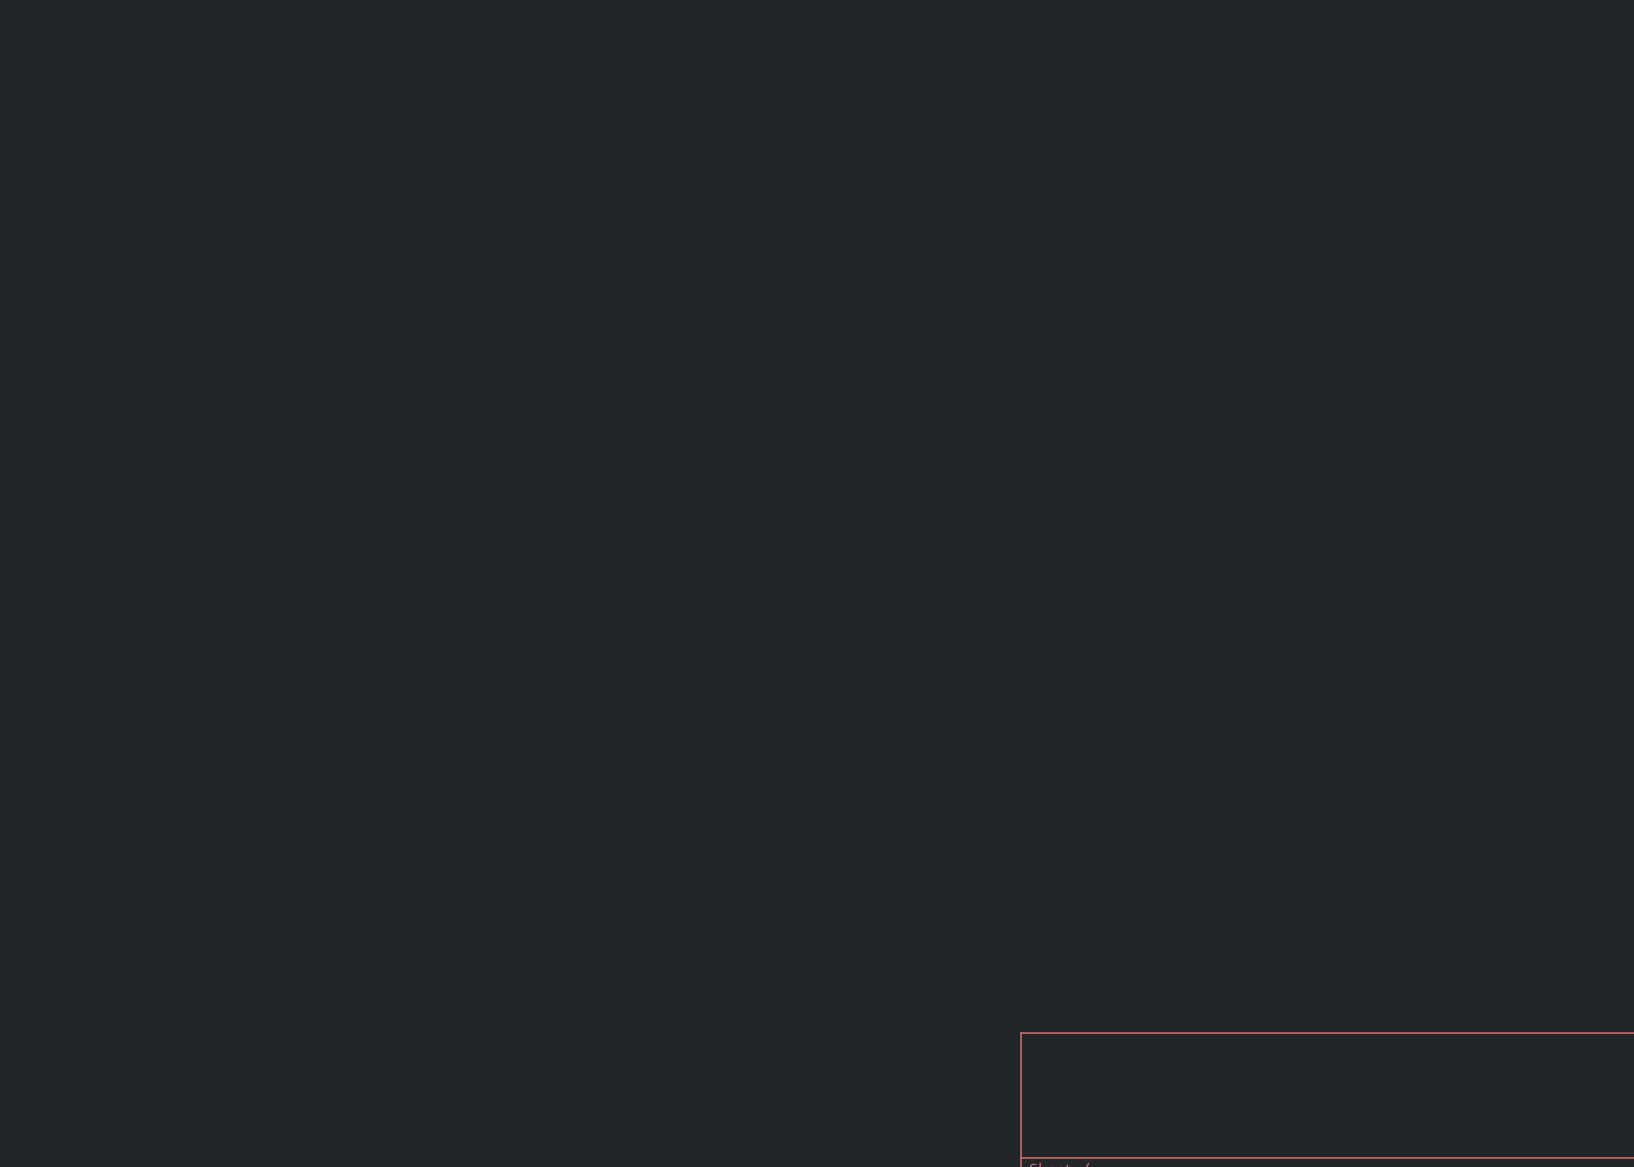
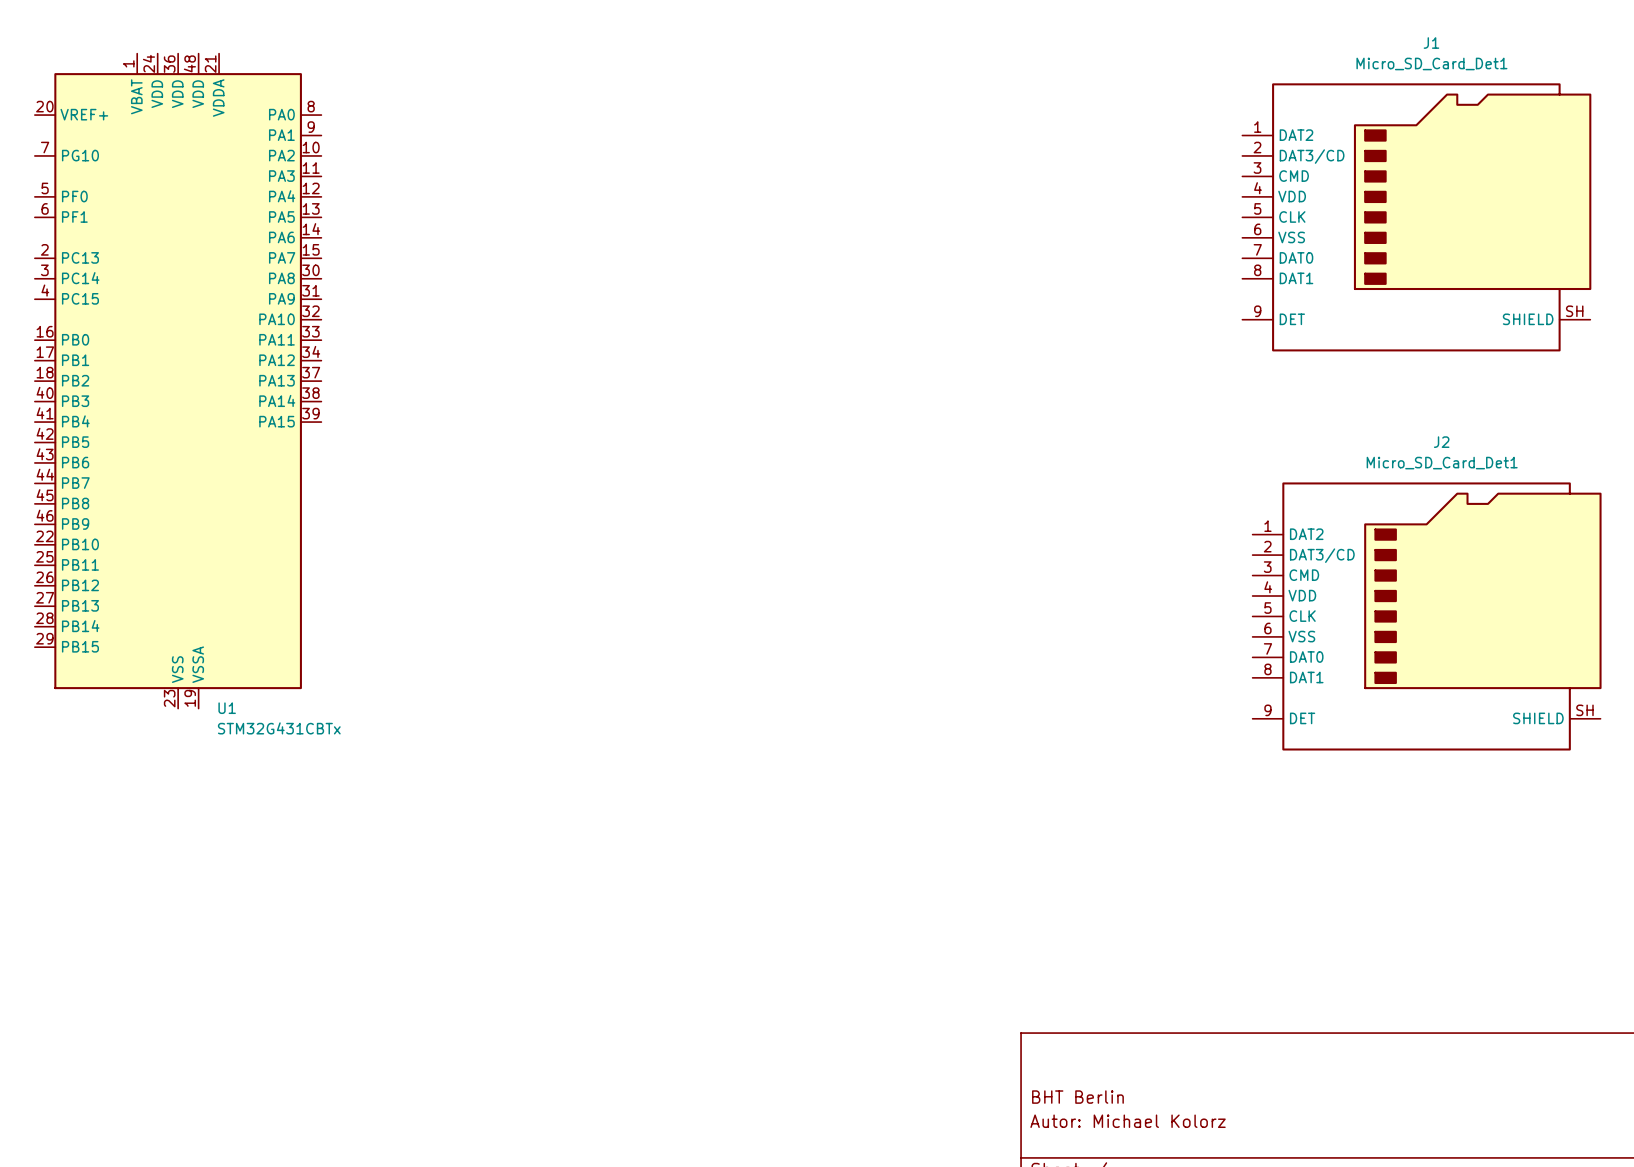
J1: none -> Micro_SD_Card_Det1 (1416, 217)
U1: none -> STM32G431CBTx (178, 381)
J2: none -> Micro_SD_Card_Det1 (1427, 616)
title block: none -> BHT Berlin (1077, 1097)
title block: none -> Autor: Michael Kolorz (1128, 1121)

